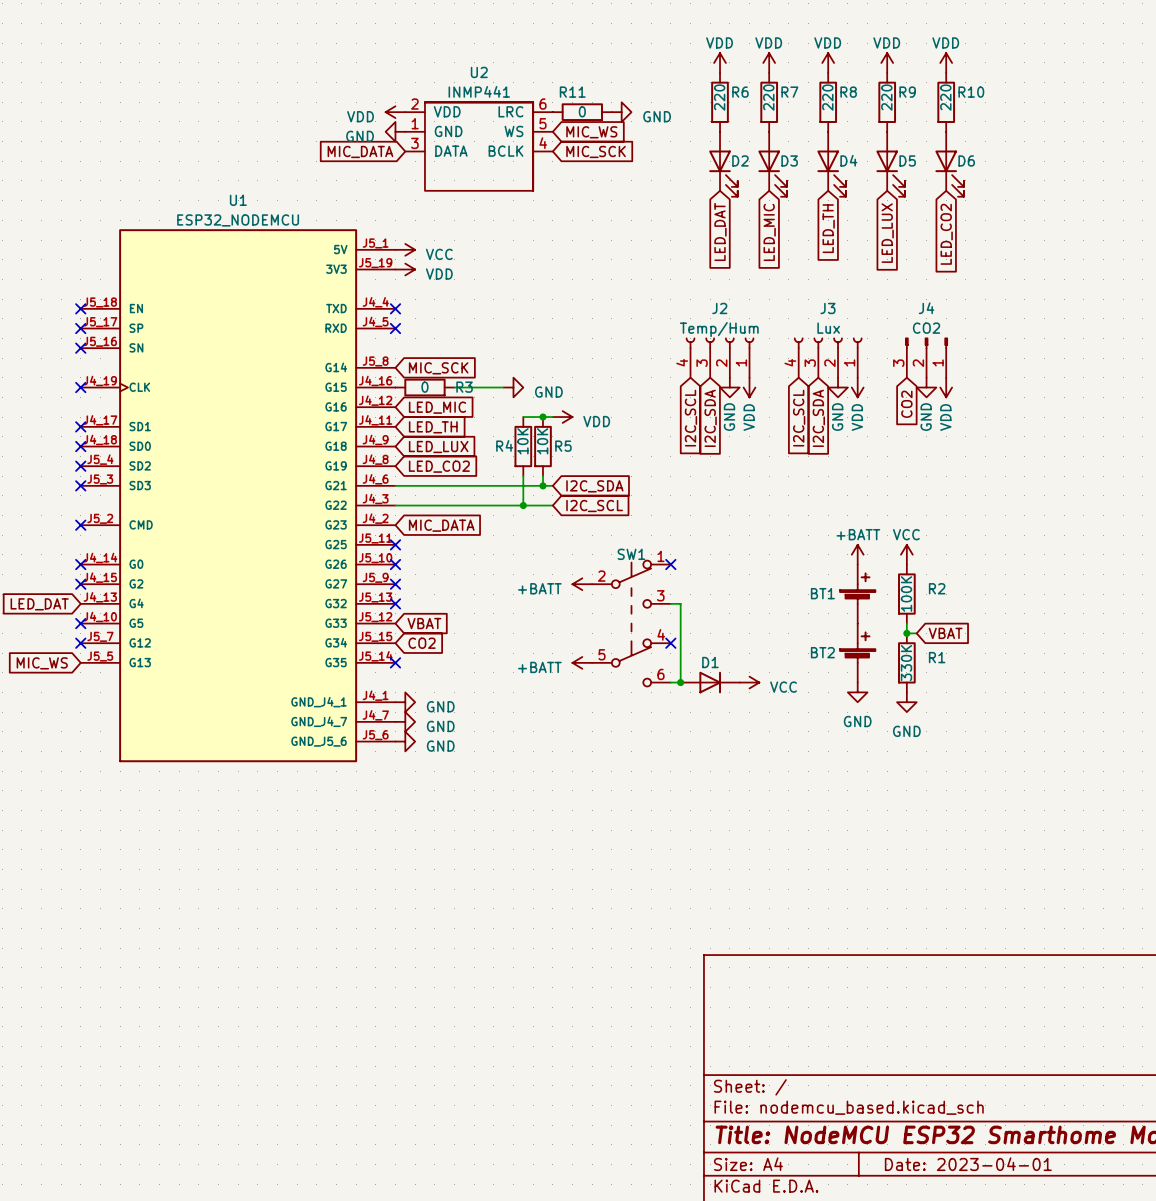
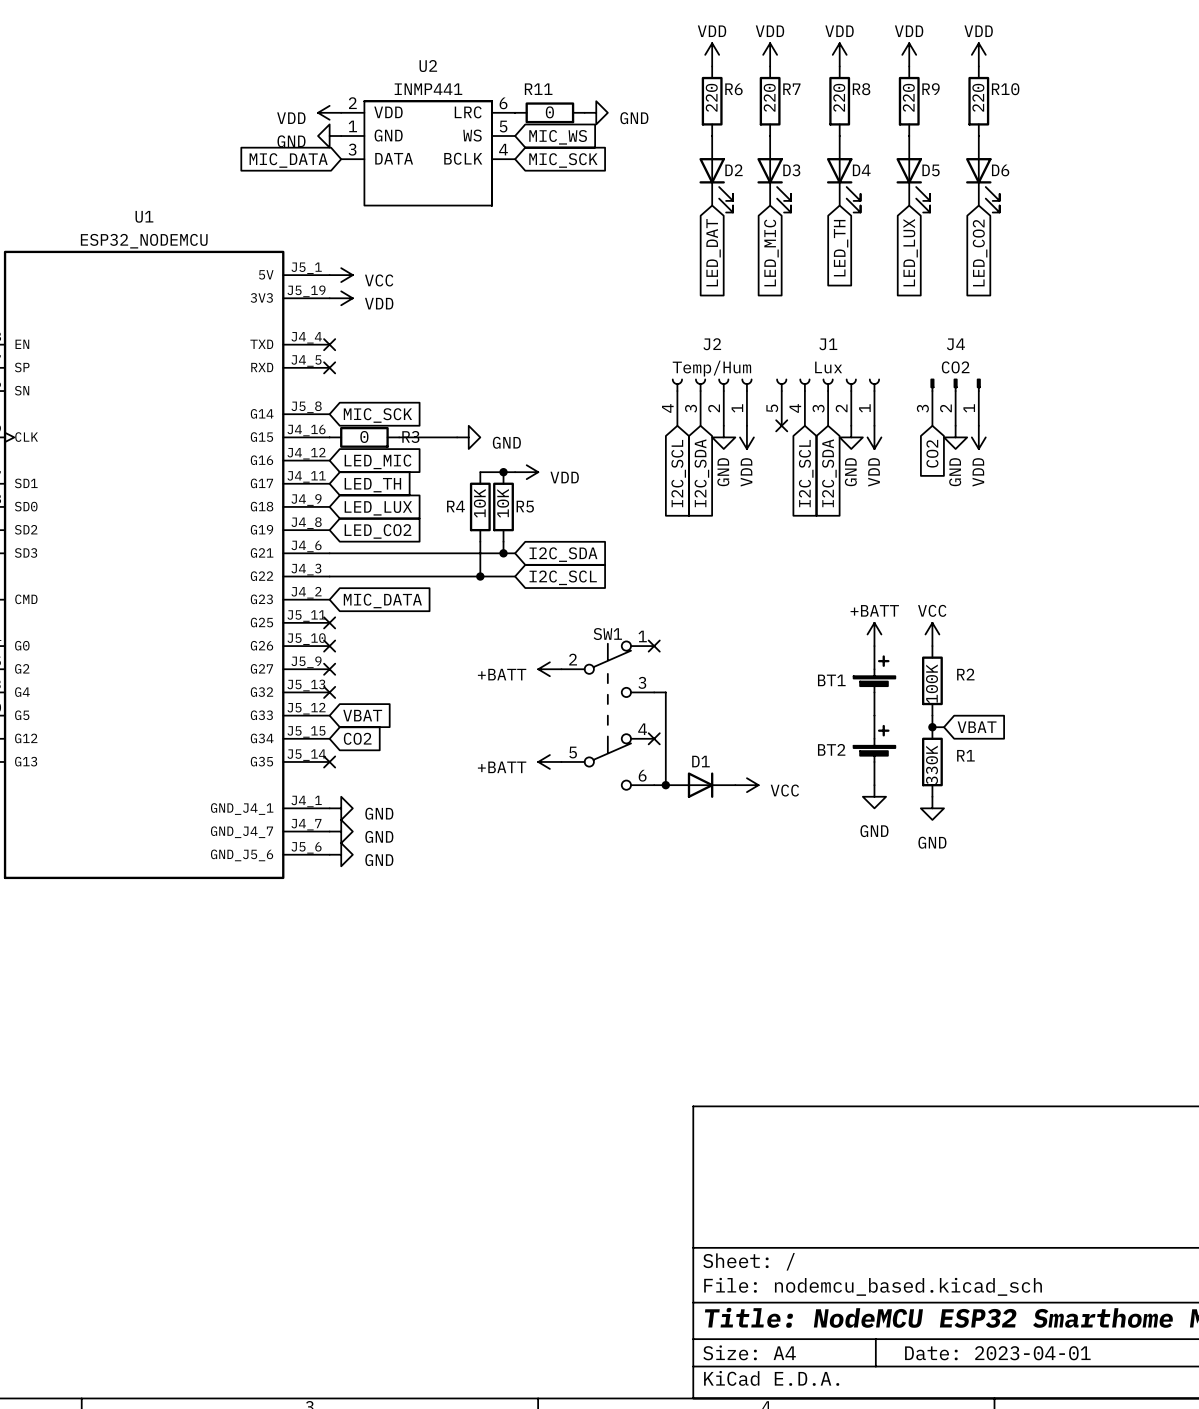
J1: none -> Lux (828, 402)
J3: Lux (828, 357) -> none
no-connect mark: none -> (781, 425)

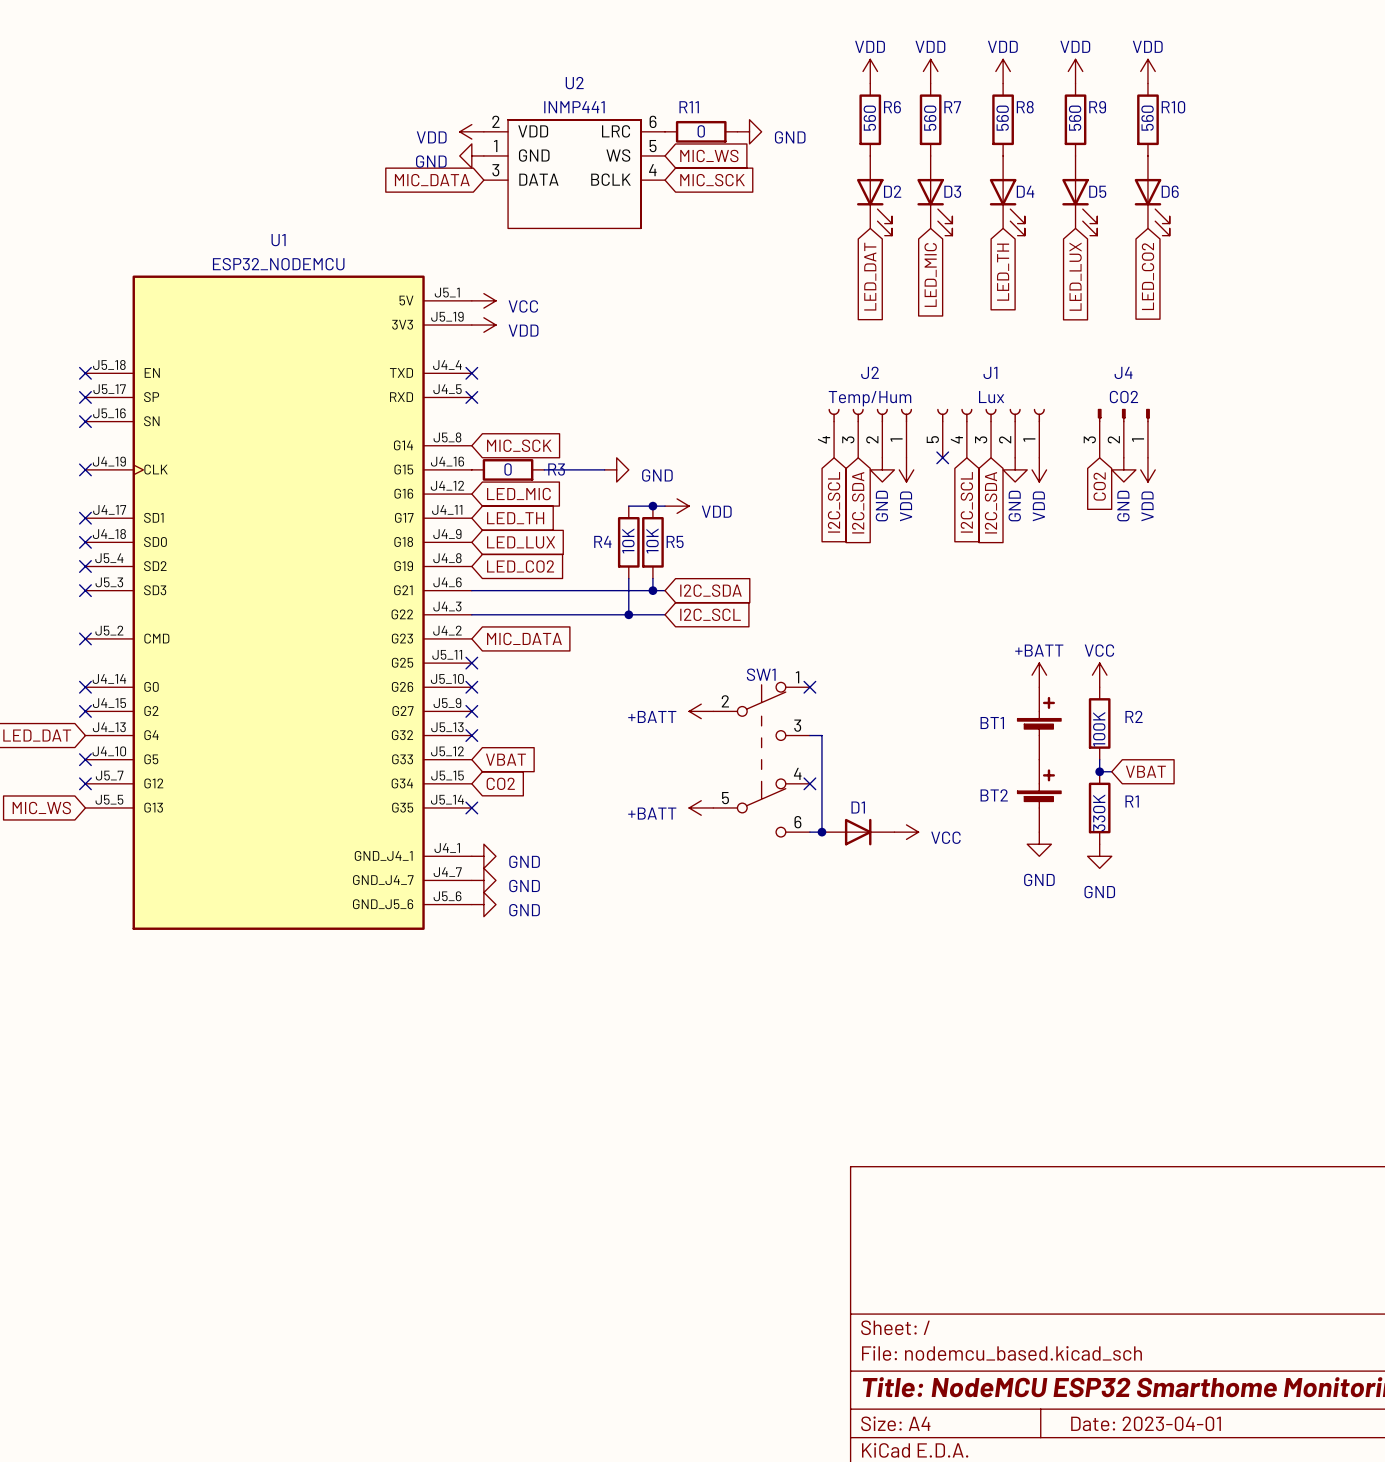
R6 value: 220 (711, 97) -> 560 (869, 118)
R7 value: 220 (769, 97) -> 560 (930, 118)
R8 value: 220 (839, 97) -> 560 (1002, 118)
R9 value: 220 (908, 97) -> 560 (1075, 118)
R10 value: 220 (978, 97) -> 560 (1147, 118)

